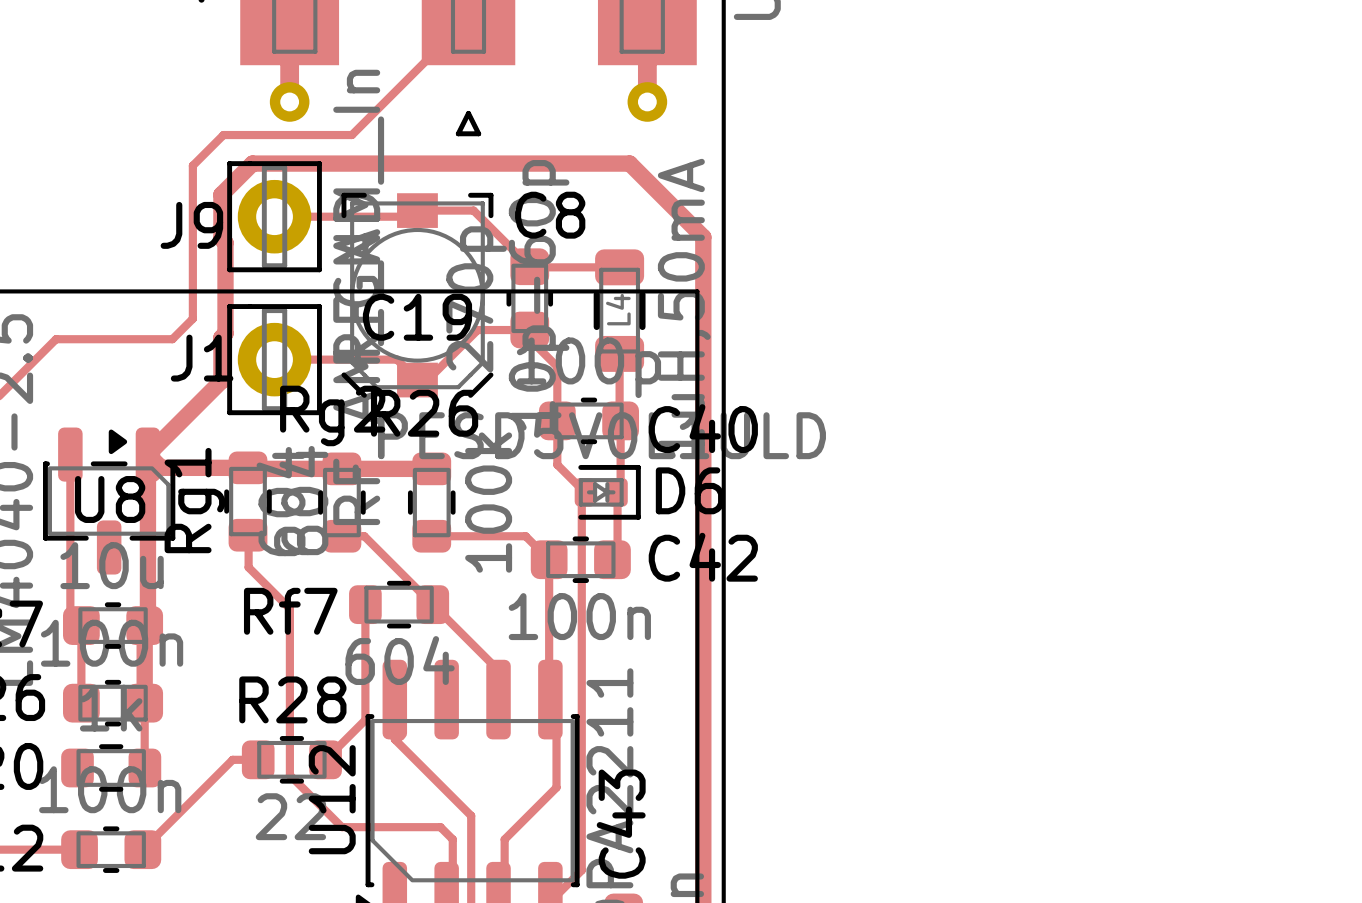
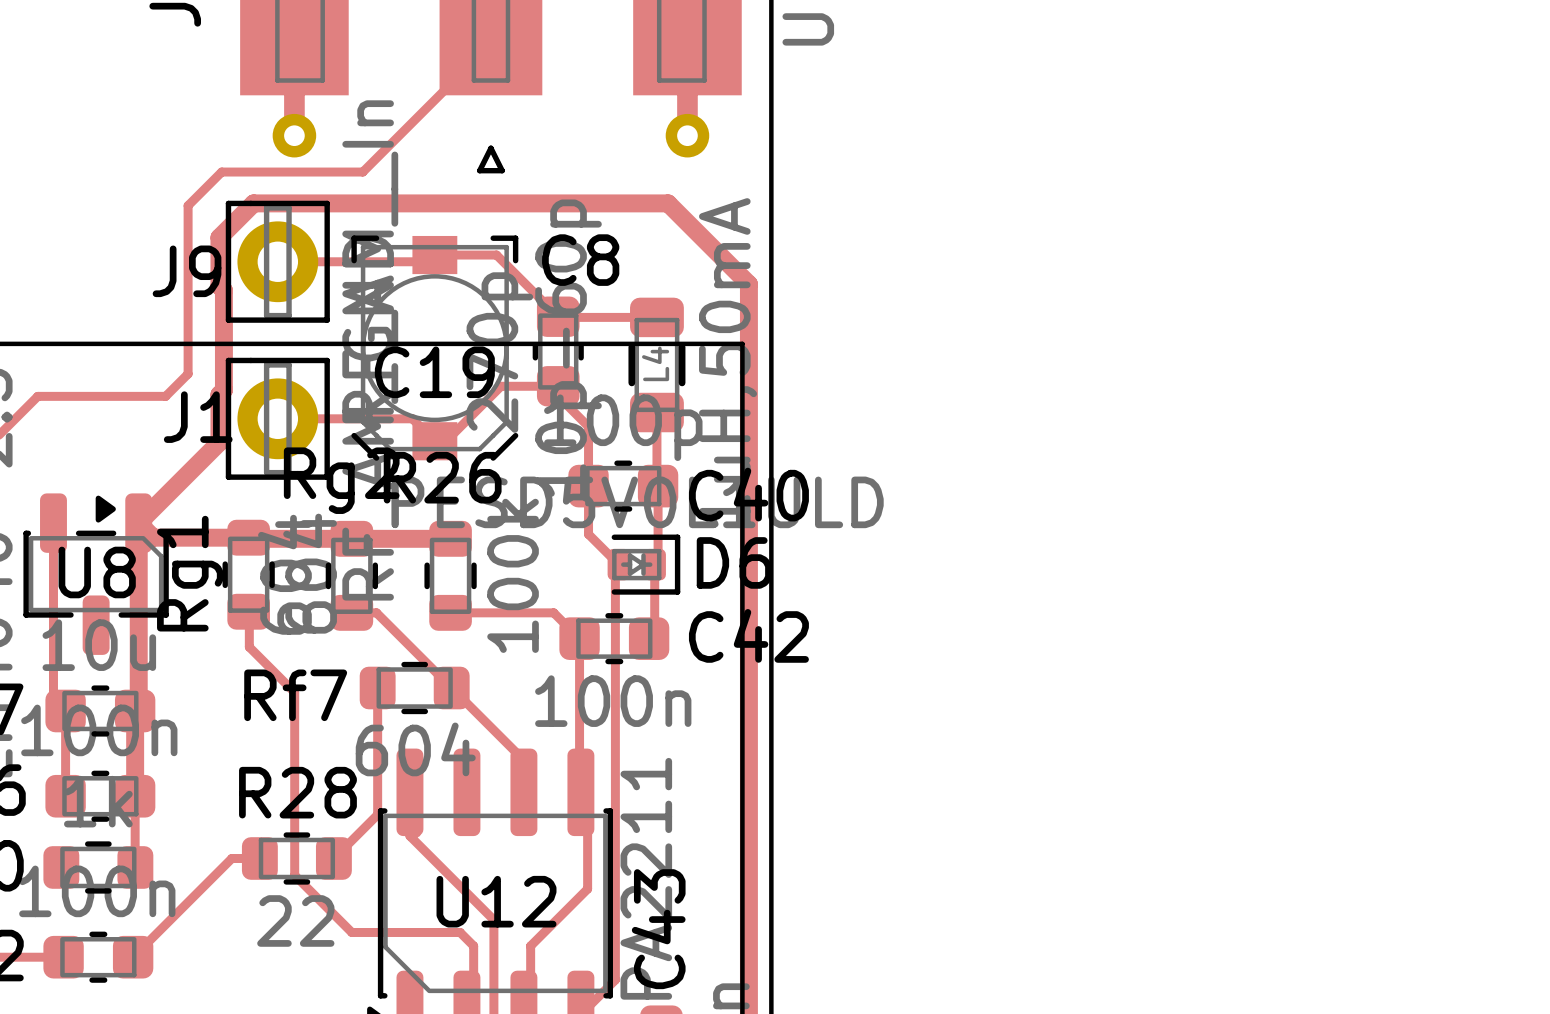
U12 name rotation: 0° (332, 799) -> 90° clockwise (496, 901)

